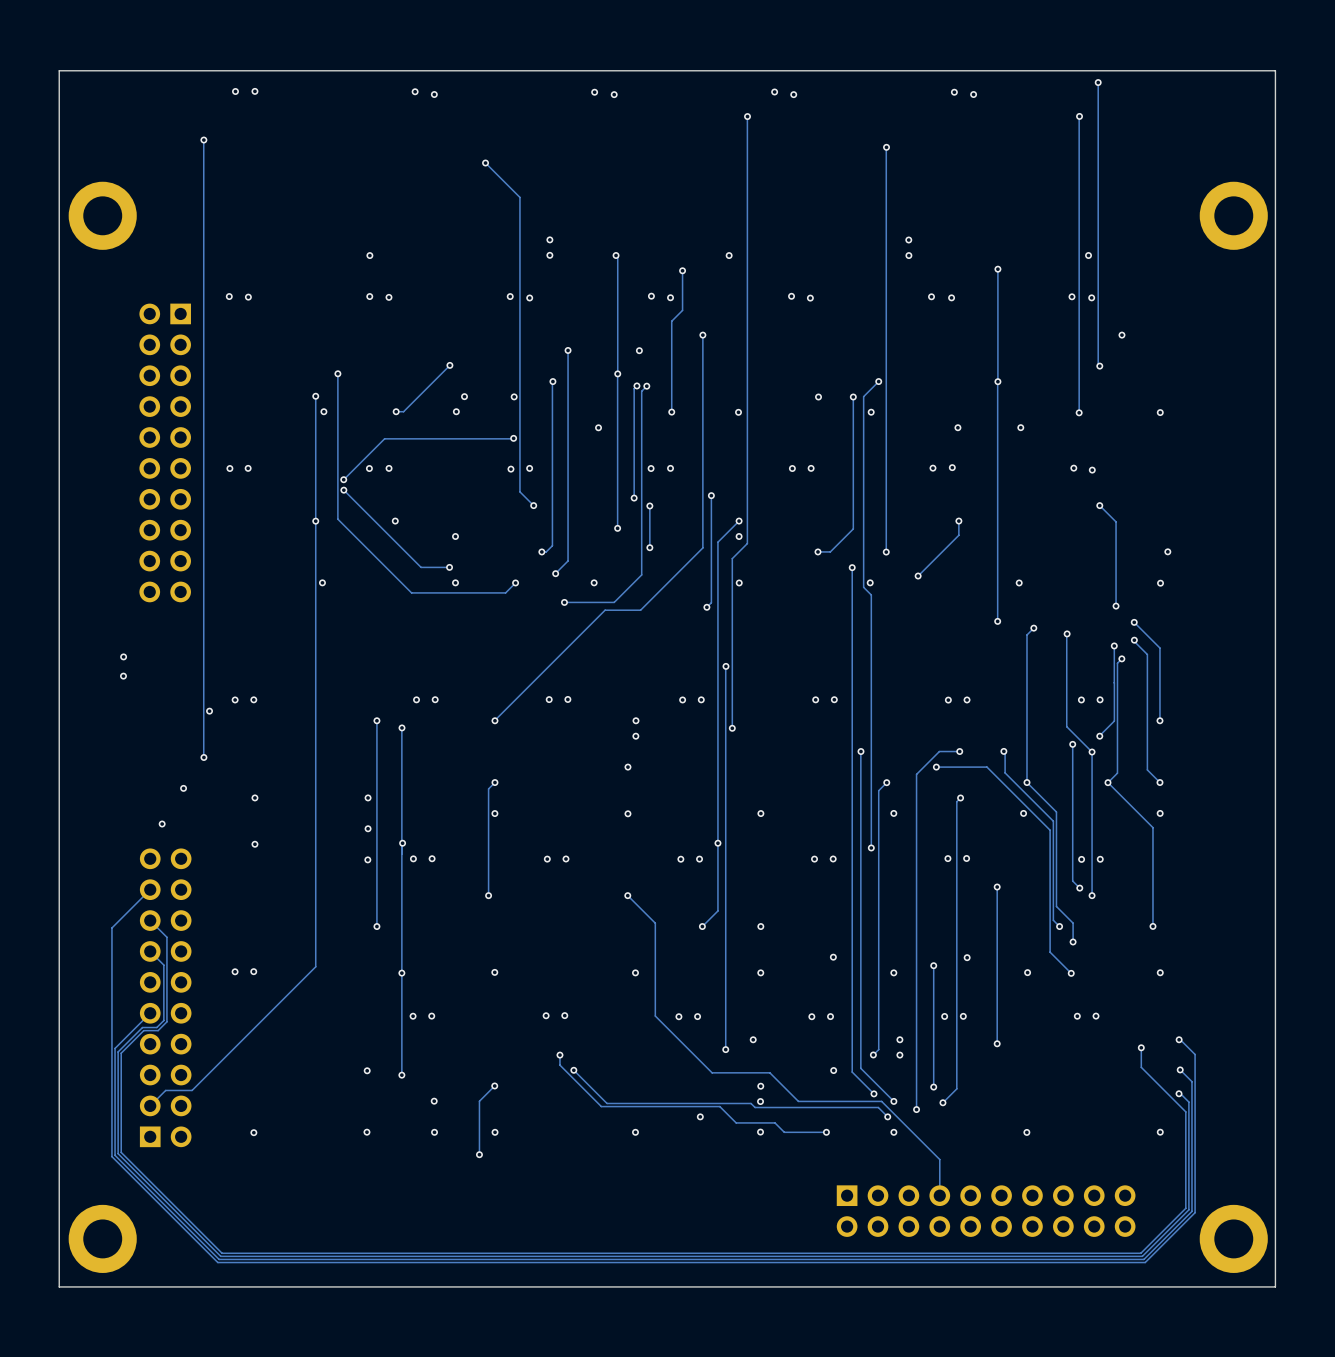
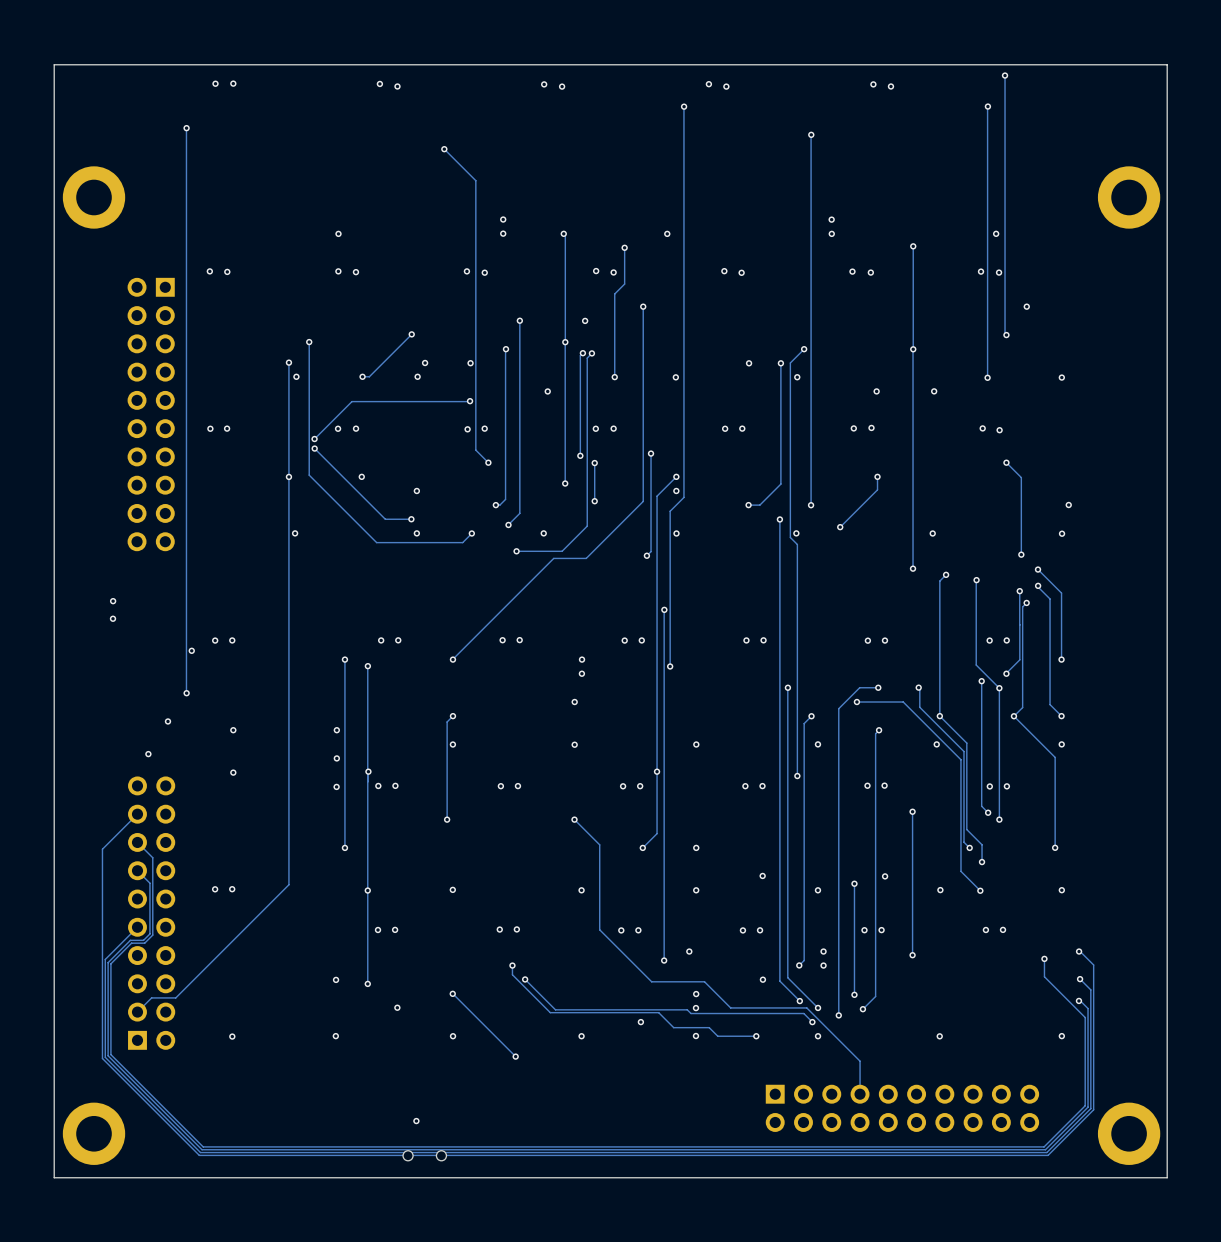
track: (494, 1085) (479, 1101) (479, 1154) -> (452, 993) (515, 1056)
via: (434, 1132) -> none
via: (479, 1154) -> none
via: none -> (515, 1056)
via: none -> (416, 1121)
part: none -> (424, 1155)

